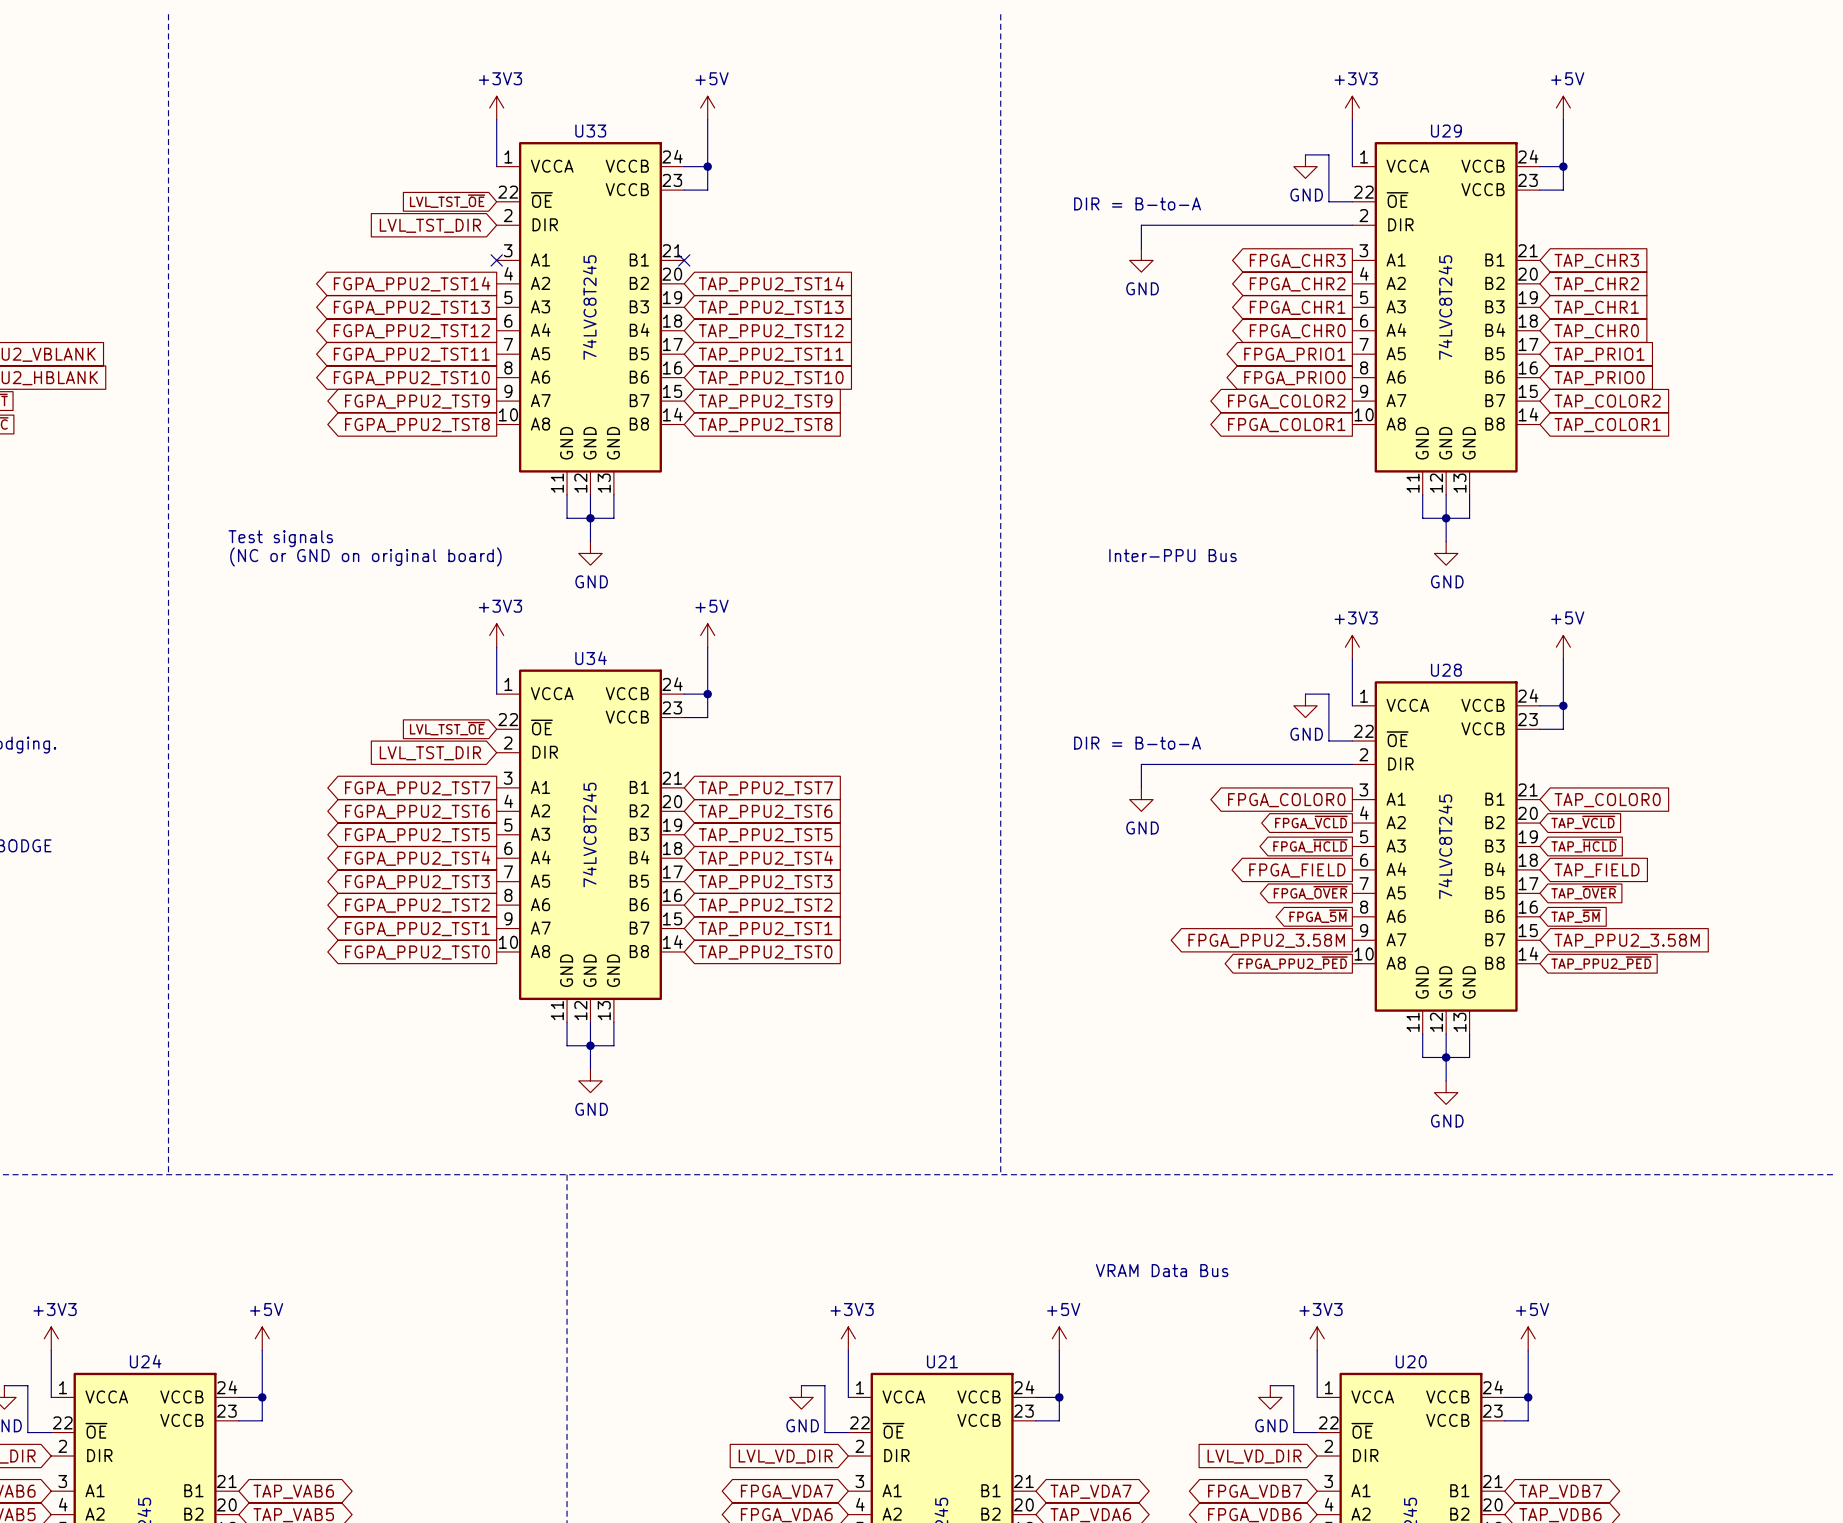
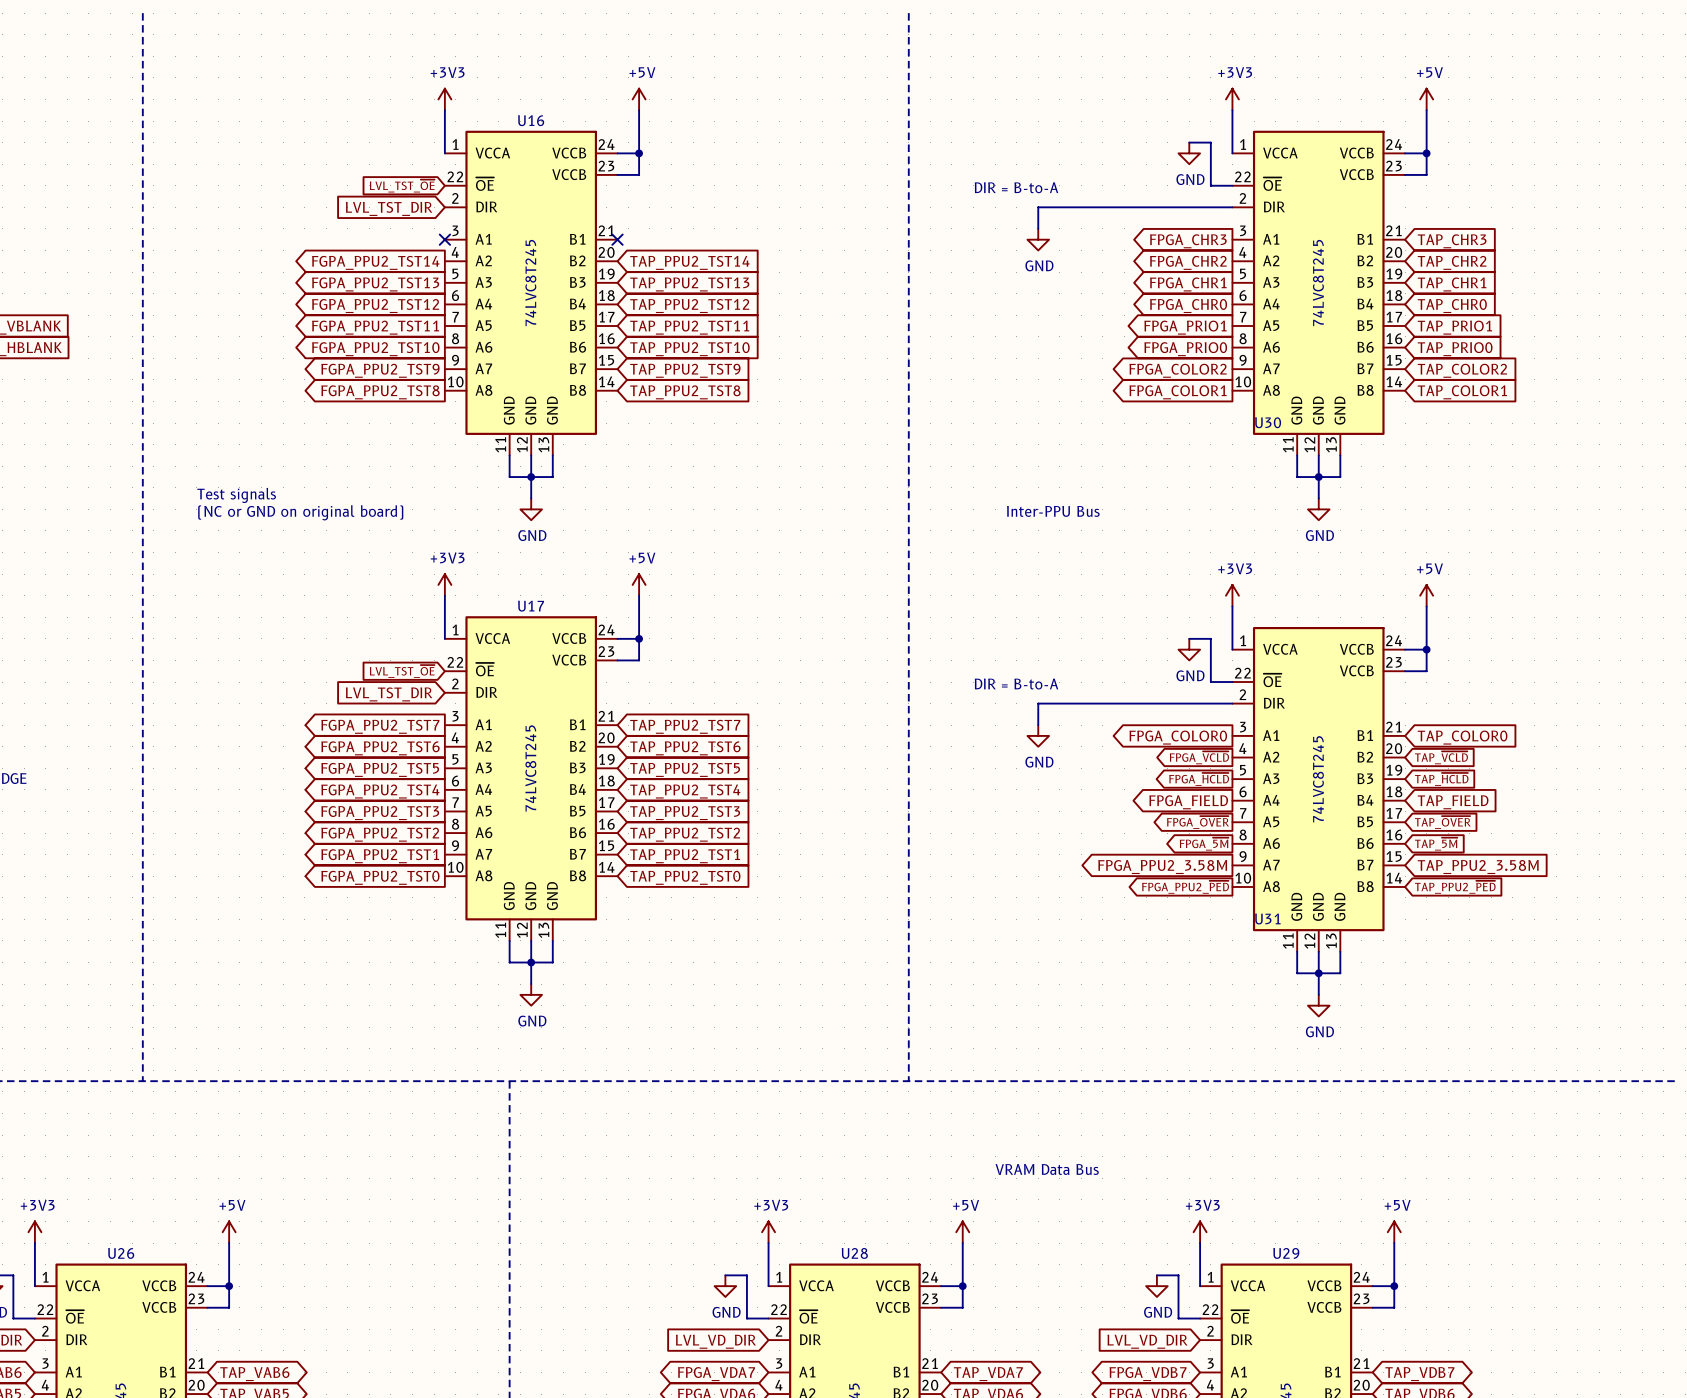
U33 name: U33 (590, 131) -> U16 (531, 120)
U29 name: U29 (1446, 131) -> U30 (1268, 422)
U34 name: U34 (591, 658) -> U17 (531, 606)
U28 name: U28 (1446, 670) -> U31 (1267, 919)
U24 name: U24 (145, 1361) -> U26 (121, 1253)
U21 name: U21 (942, 1361) -> U28 (854, 1253)
U20 name: U20 (1411, 1361) -> U29 (1286, 1253)

